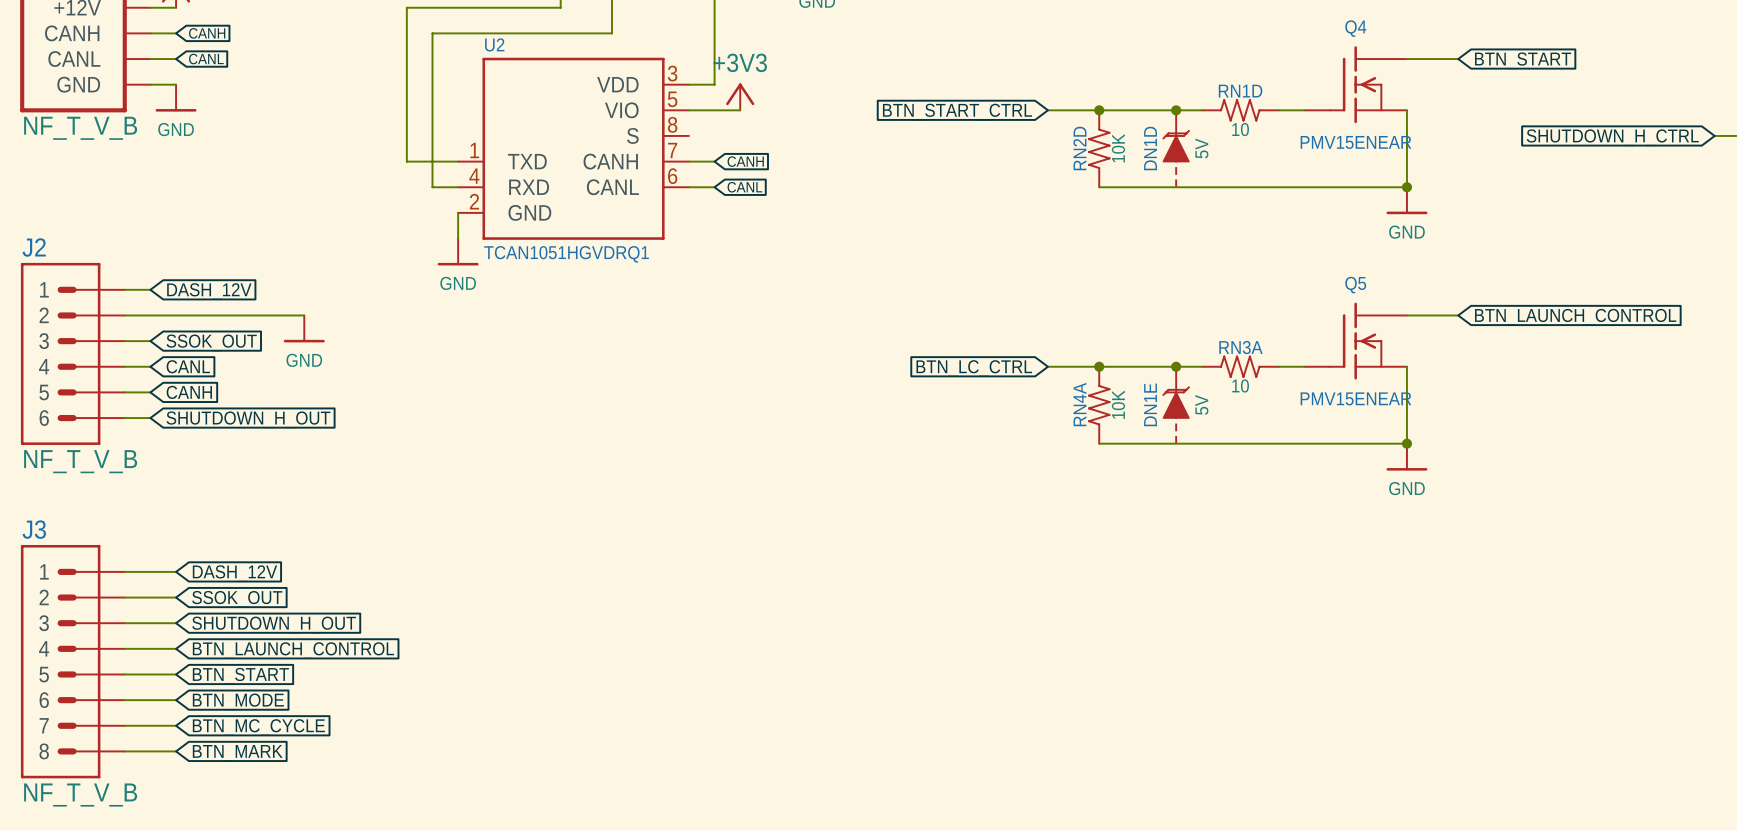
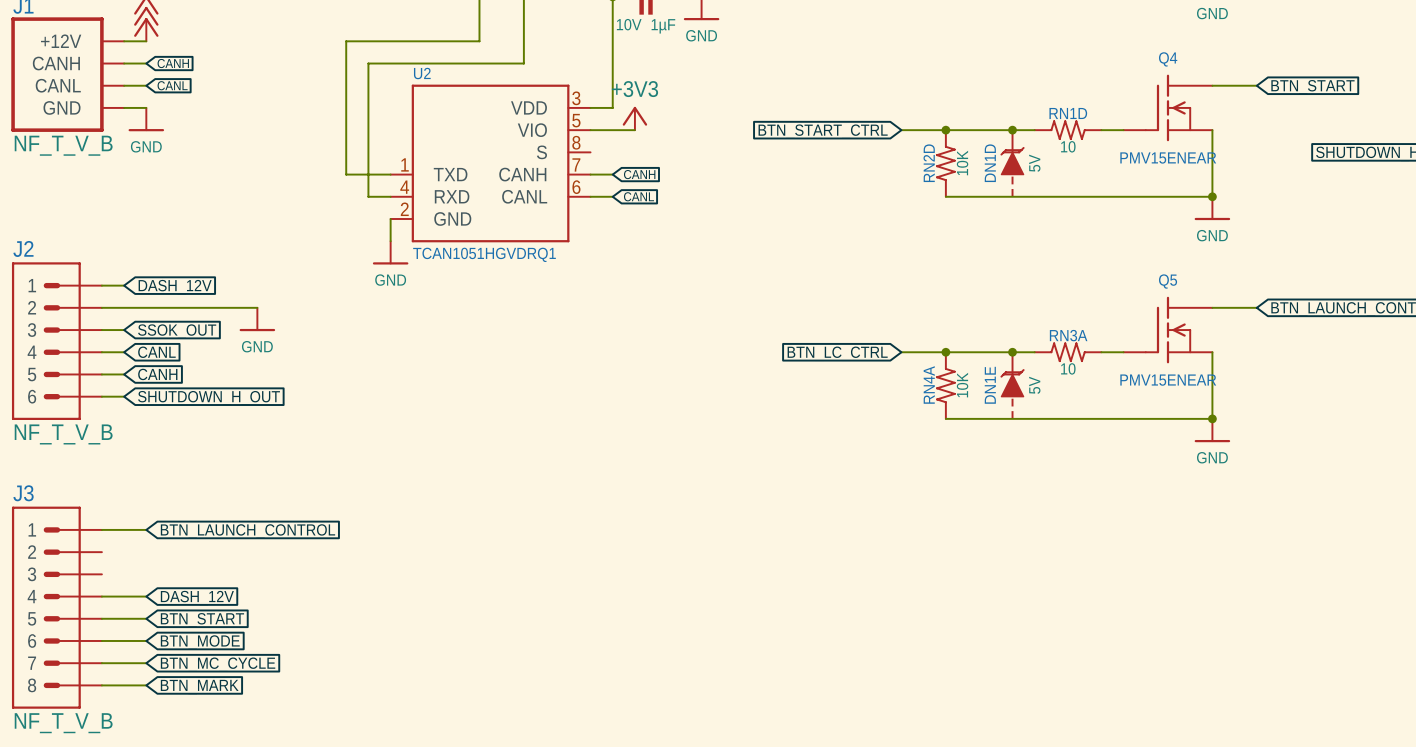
global label: DASH_12V (234, 573) -> BTN_LAUNCH_CONTROL (247, 531)
wire: (124, 597) (176, 597) -> none
global label: SSOK_OUT (237, 599) -> none
wire: (124, 623) (176, 623) -> none
global label: SHUTDOWN_H_OUT (274, 624) -> none
global label: BTN_LAUNCH_CONTROL (293, 650) -> DASH_12V (197, 598)

